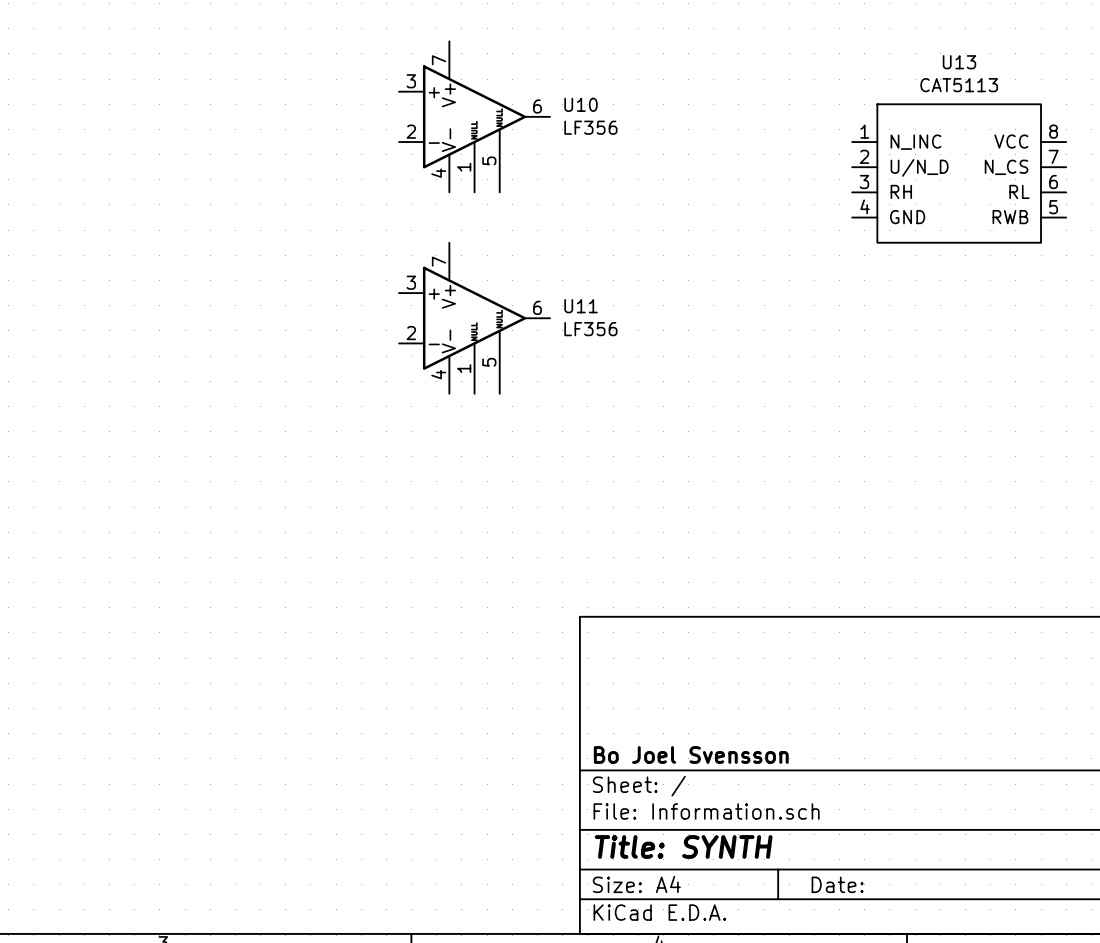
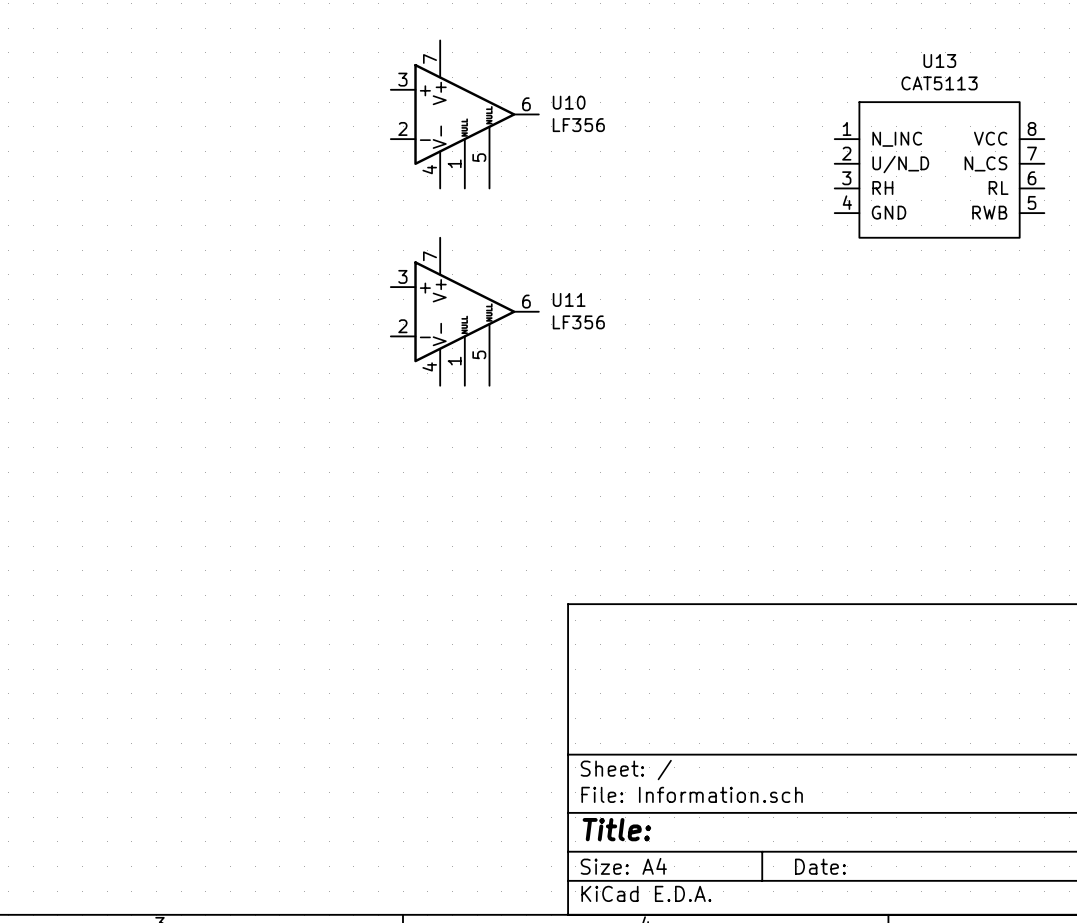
title block: Bo Joel Svensson (691, 754) -> none
title block: Title: SYNTH (683, 846) -> Title: (616, 829)

